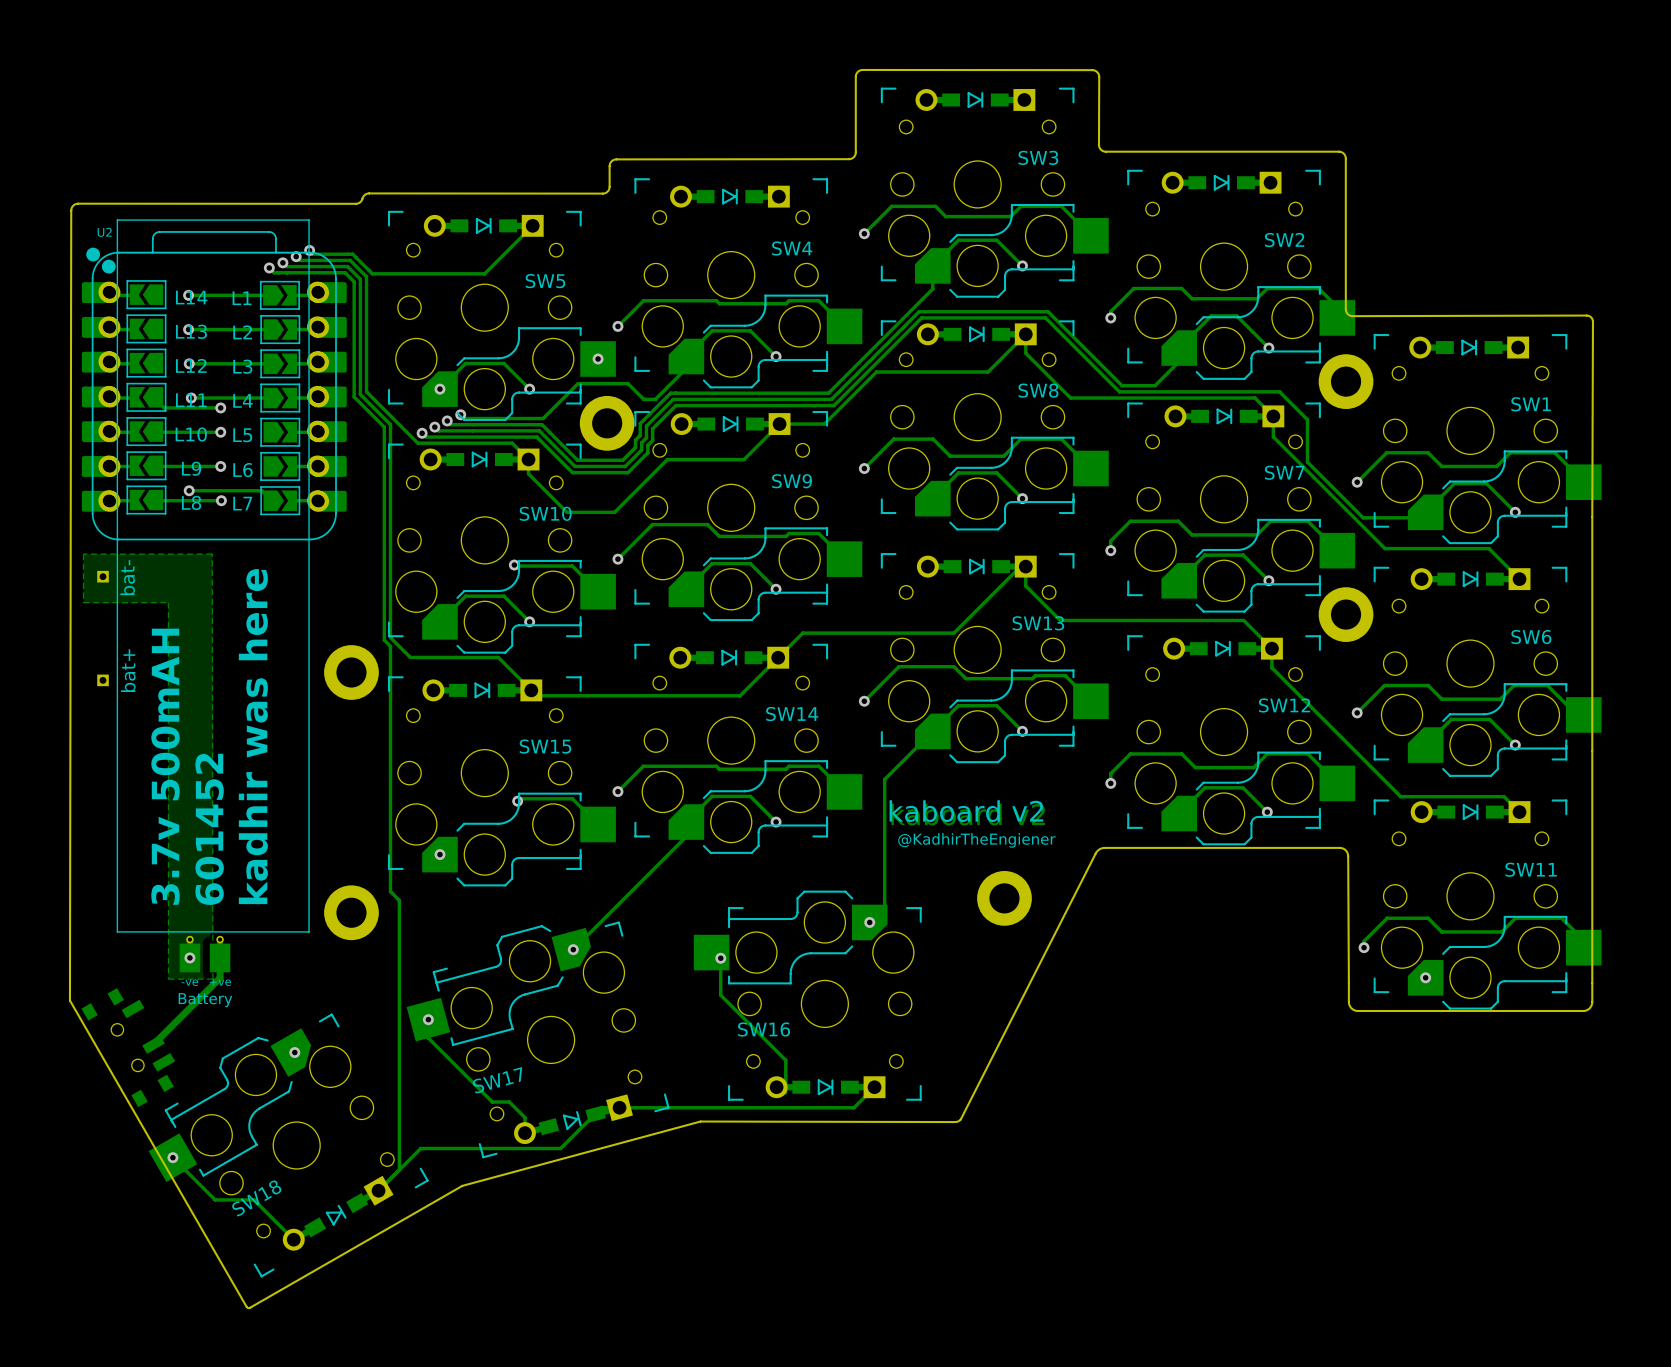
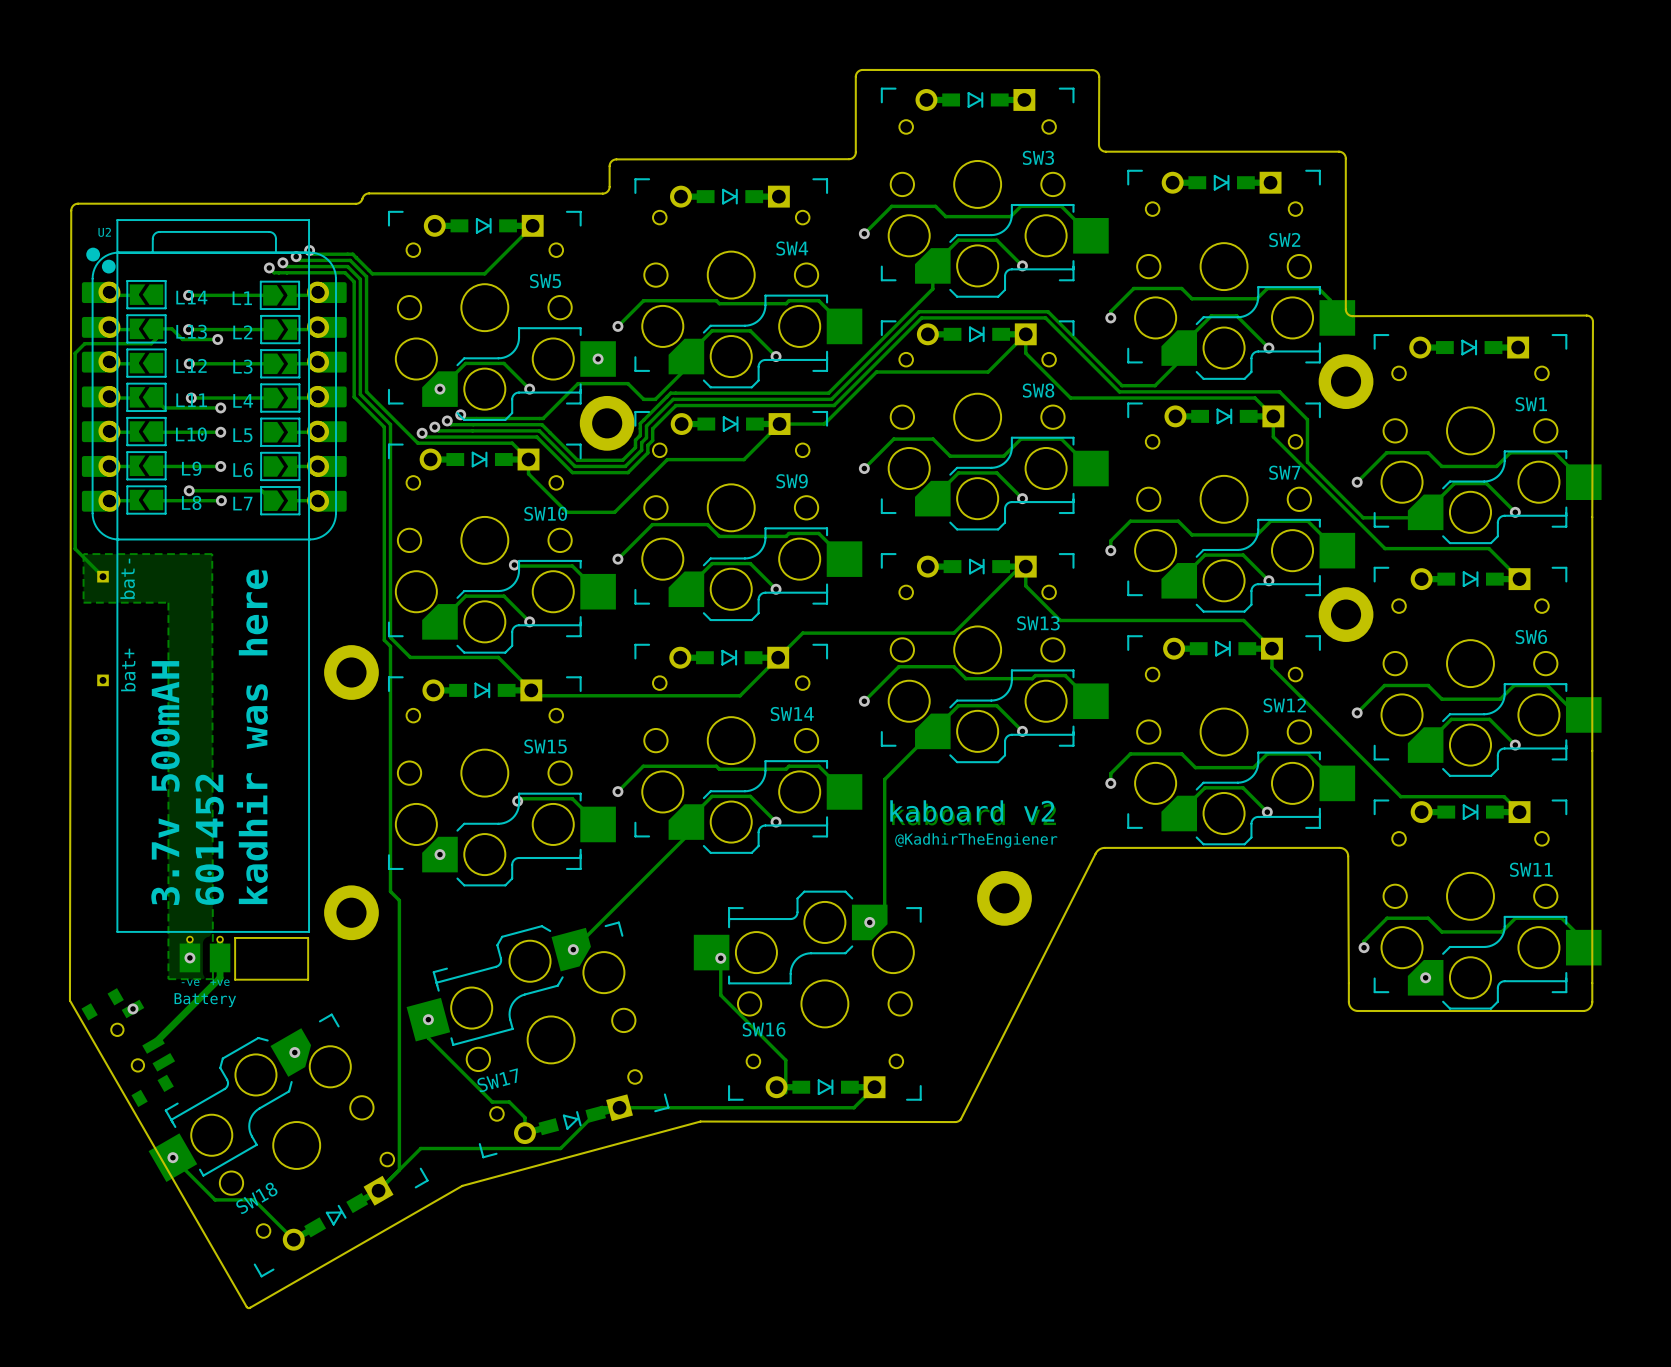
track: none -> (217, 339) (182, 339) (171, 328) (156, 328) (156, 338) (151, 343) (84, 343) (75, 353) (75, 548) (103, 576)
via: none -> (217, 339)
board edge: none -> (308, 937) (235, 937) (235, 979) (308, 979) (308, 937)
via: none -> (132, 1008)

